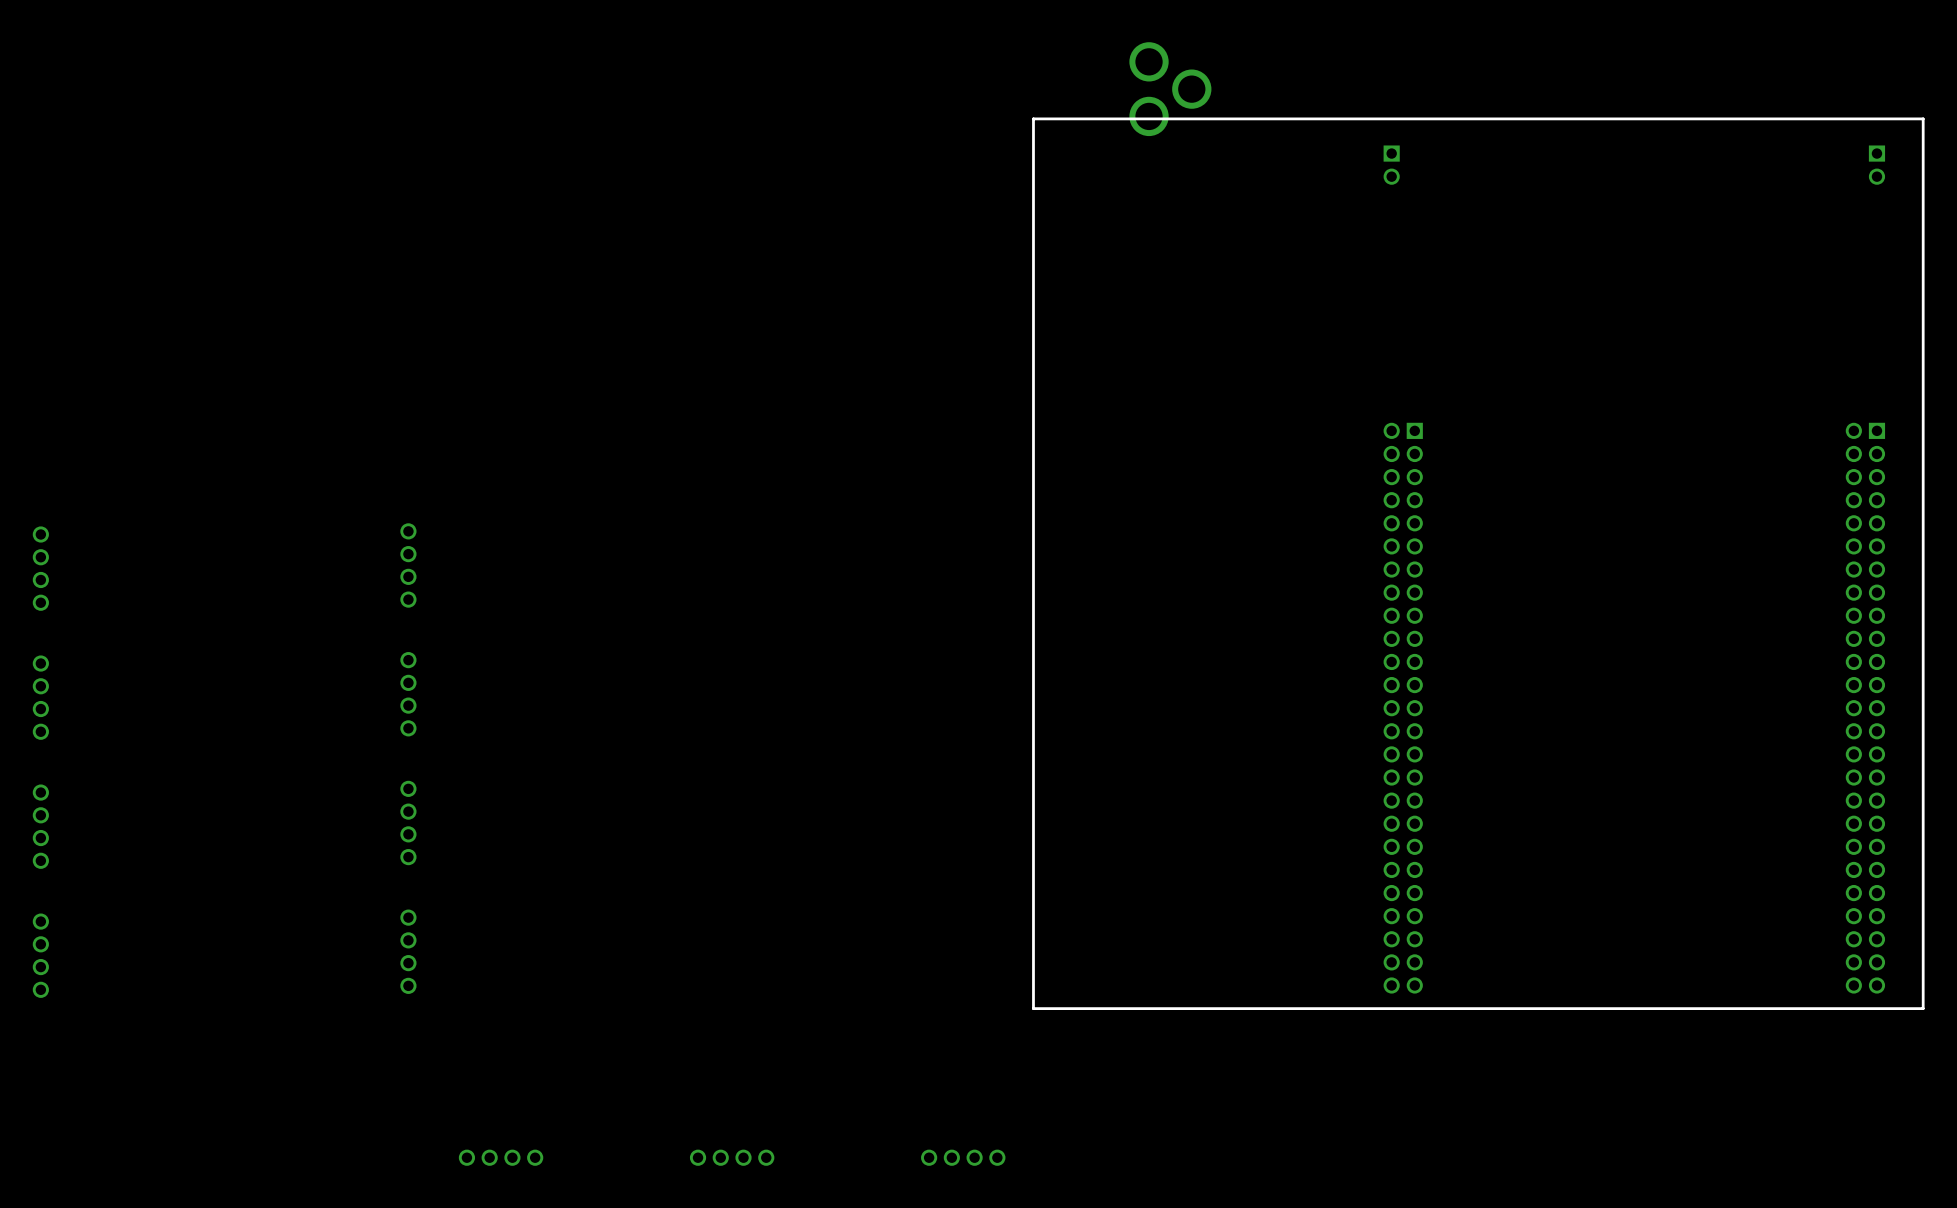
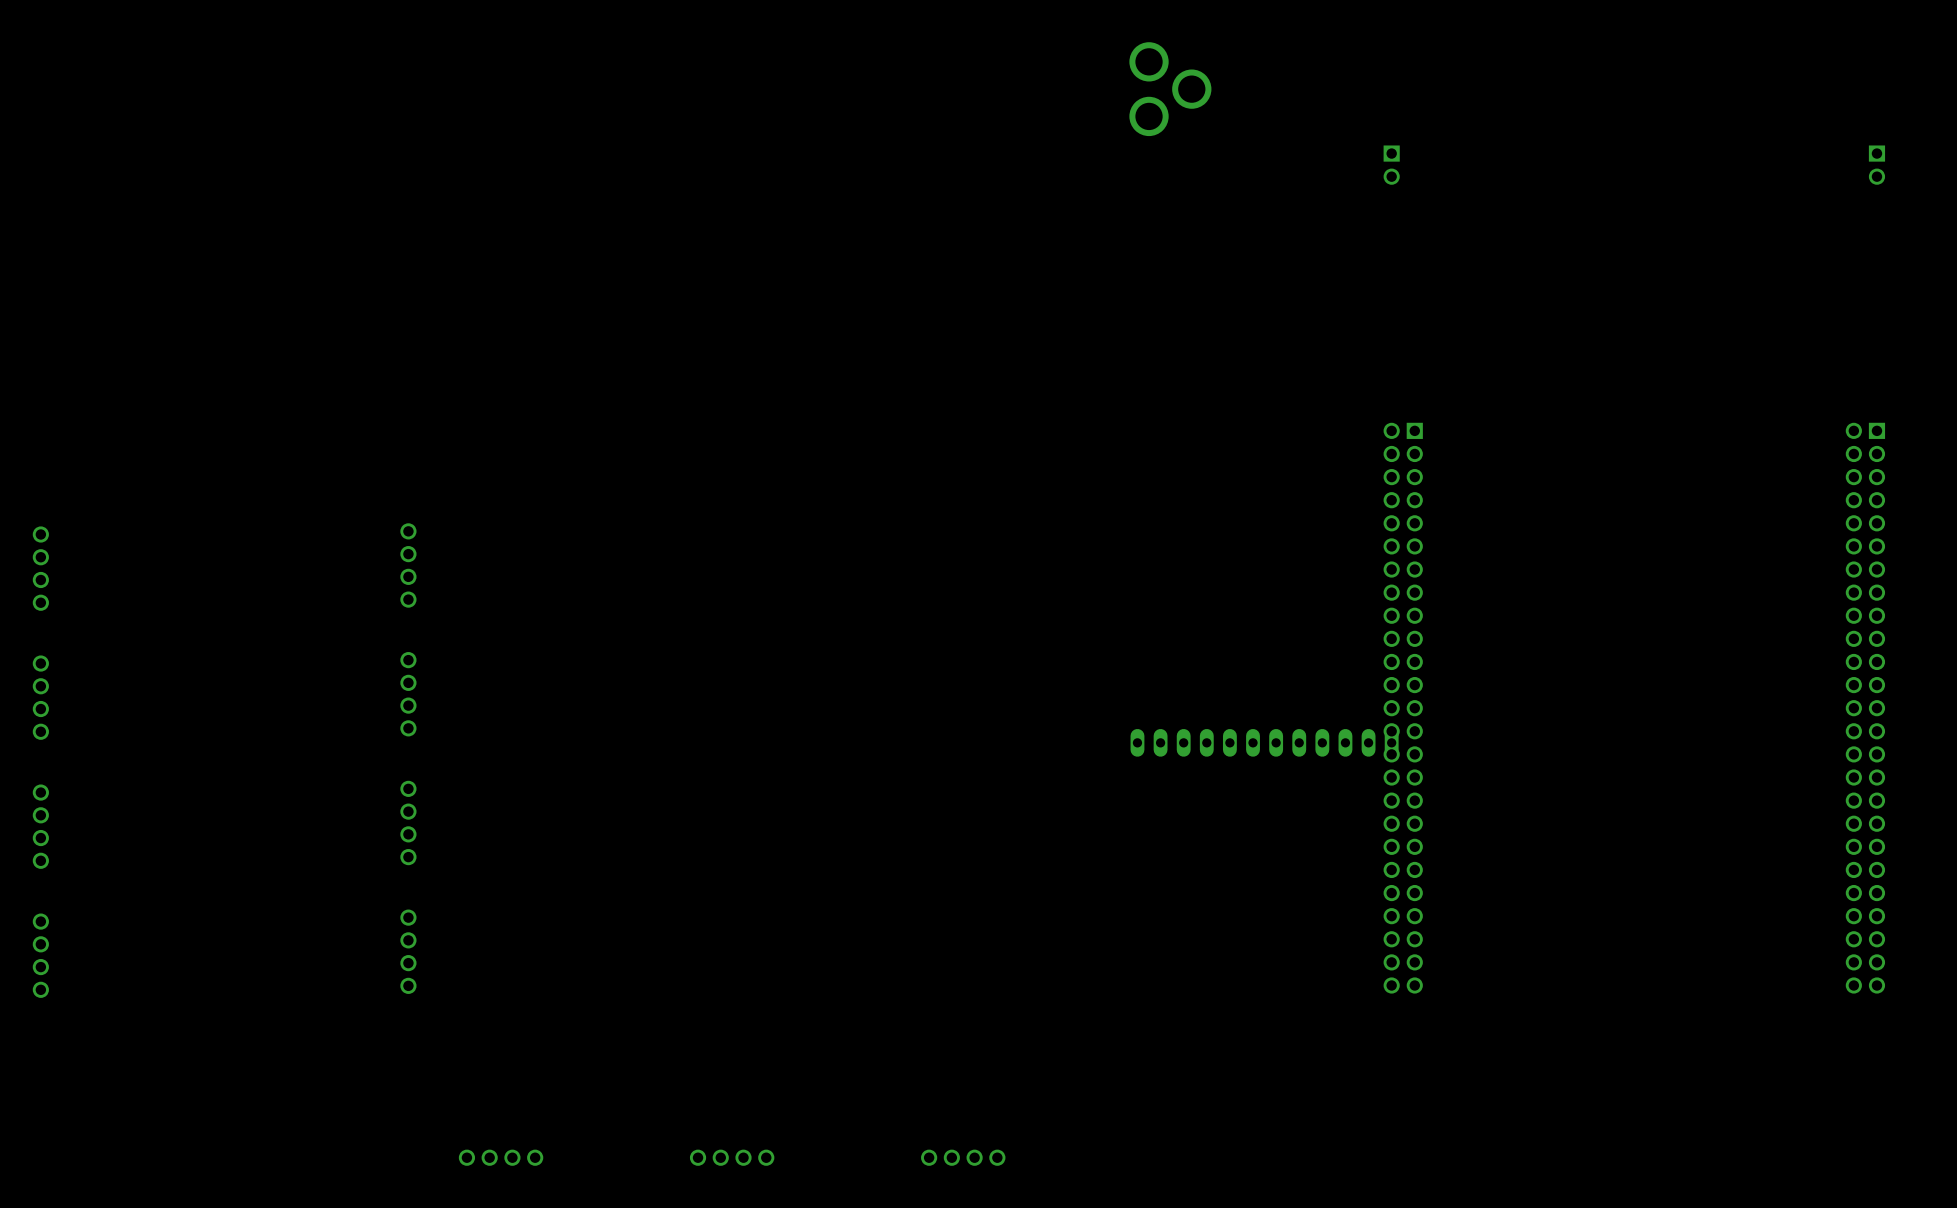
board edge: (1923, 118) (1923, 1008) (1033, 1008) (1033, 118) (1923, 118) -> none
part: none -> (1264, 742)

